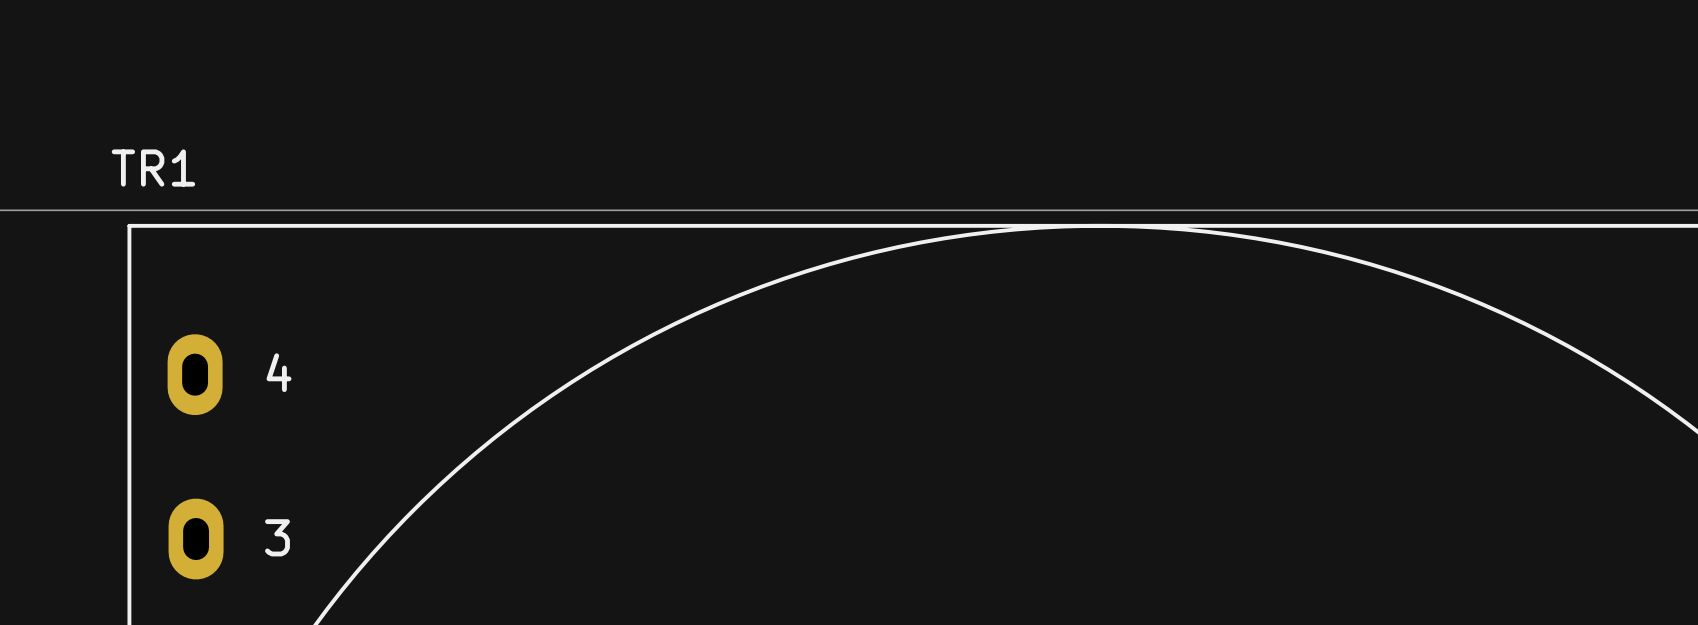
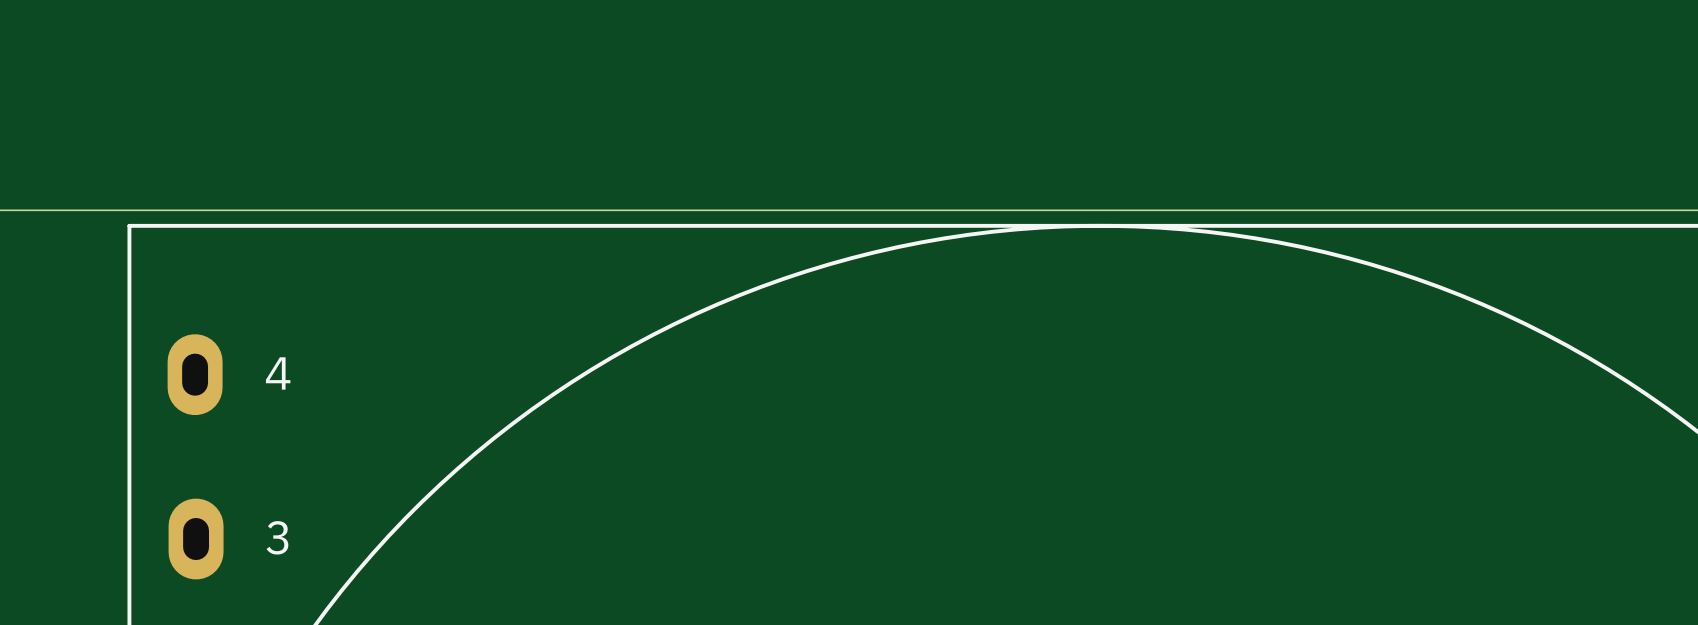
TR1 name: TR1 (153, 168) -> none

